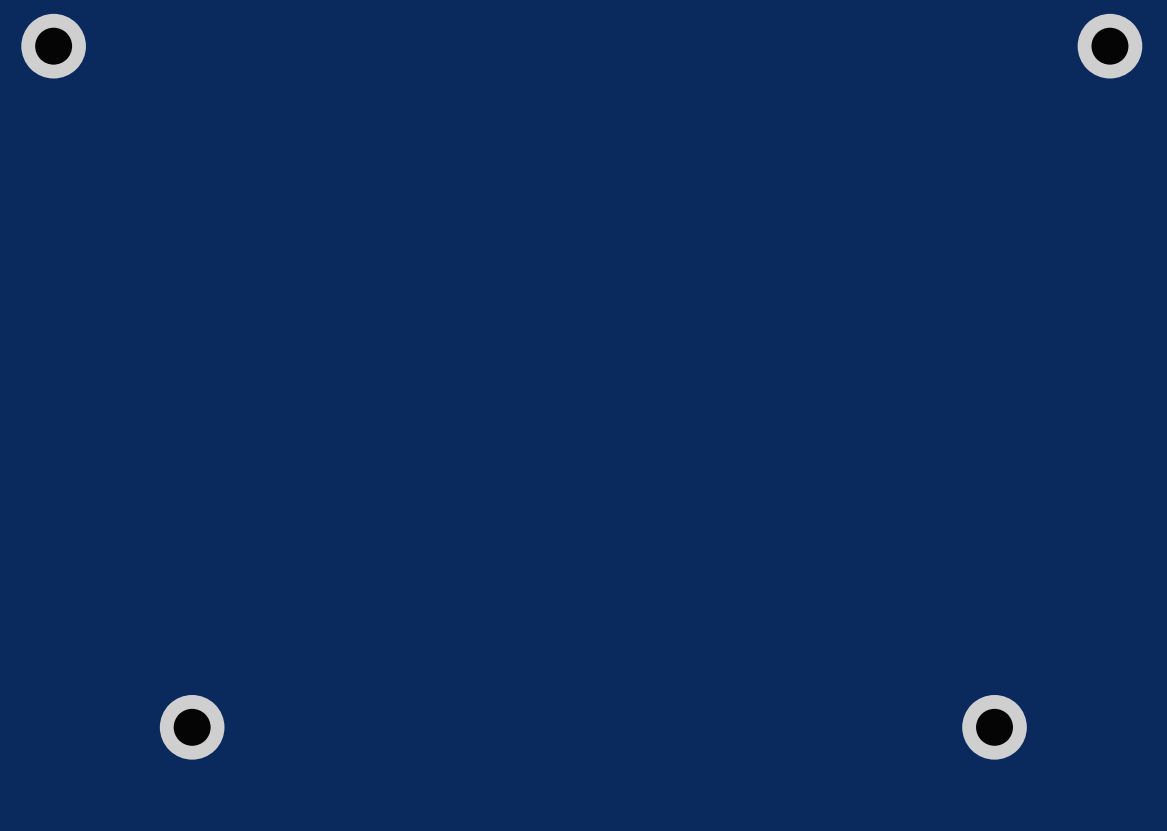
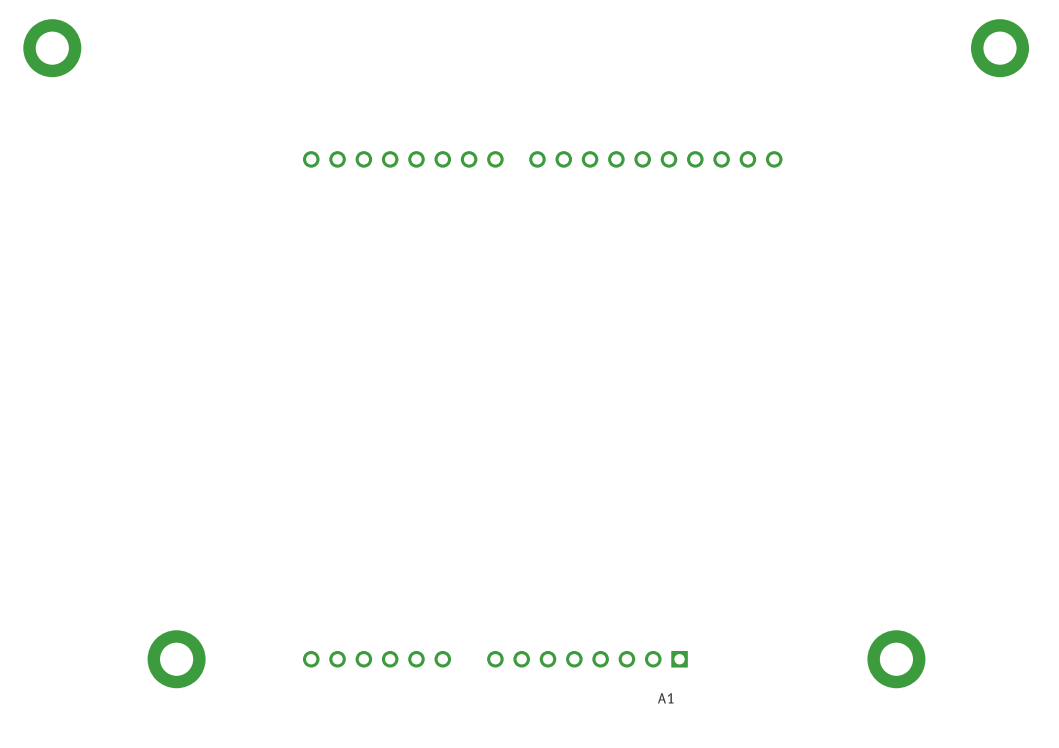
A1: none -> (542, 409)

